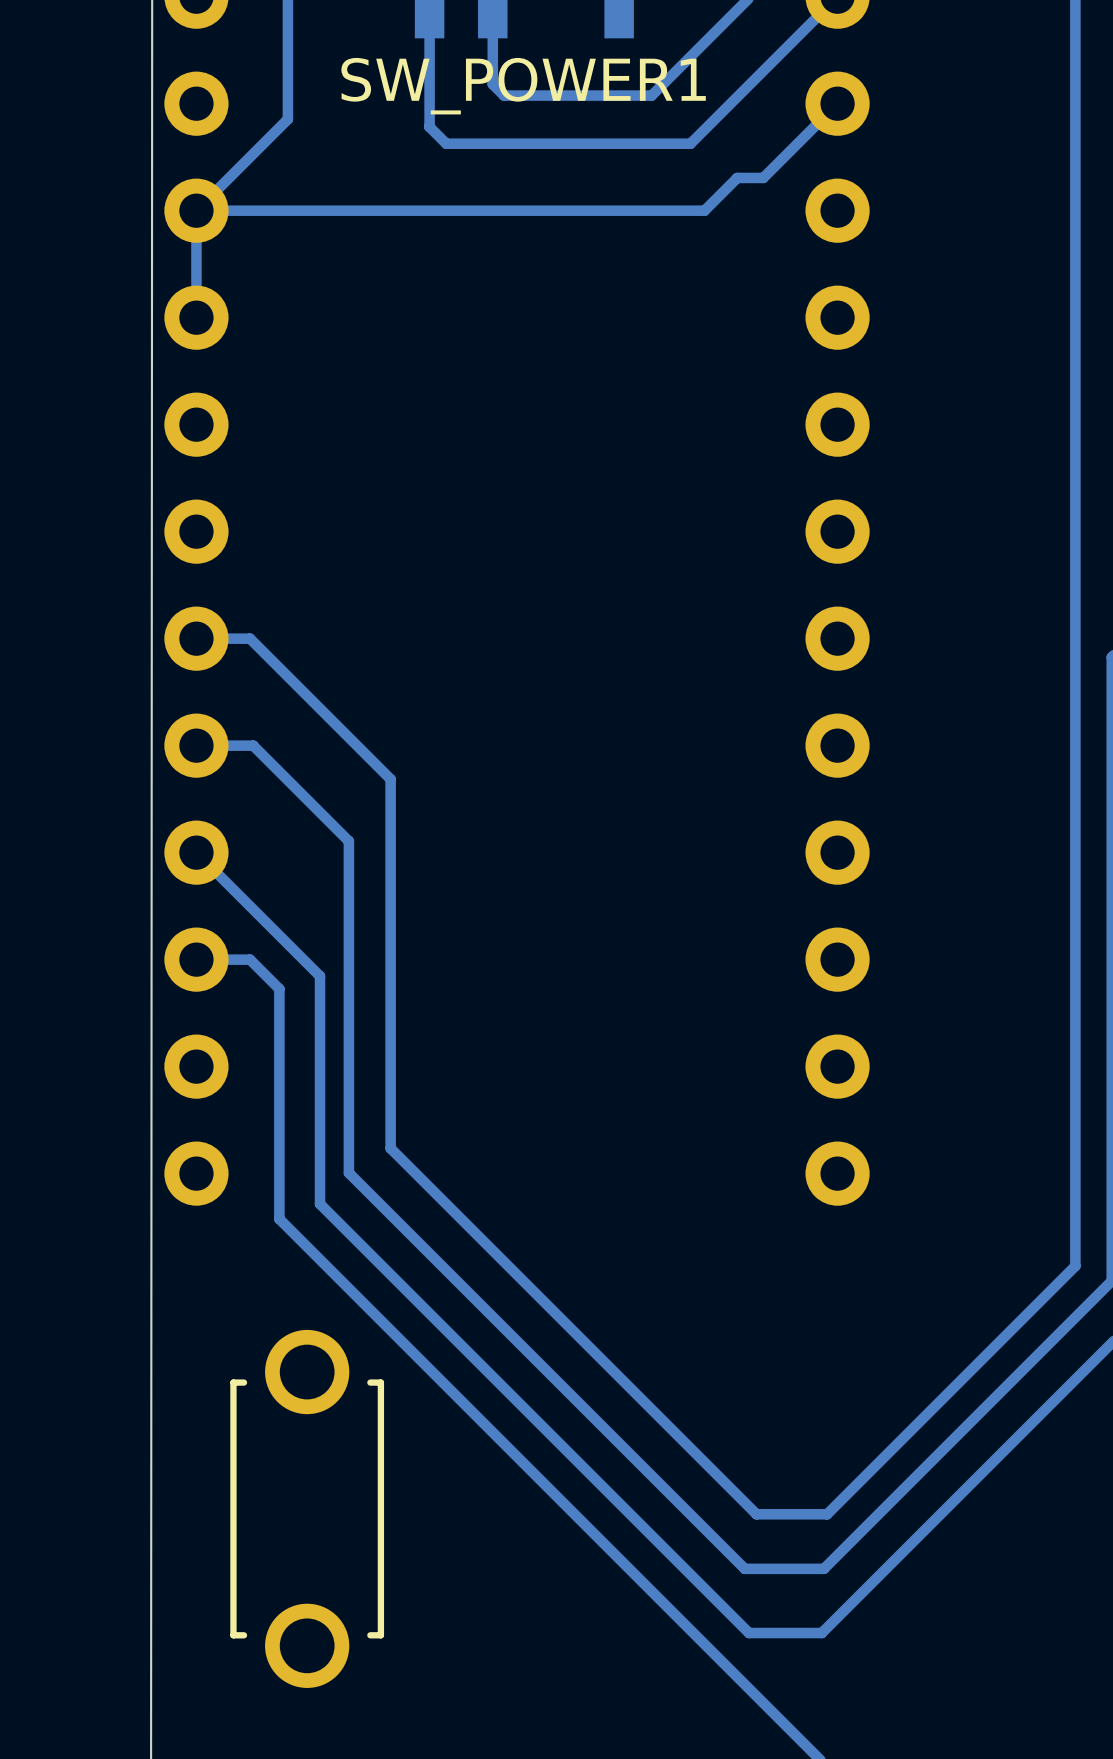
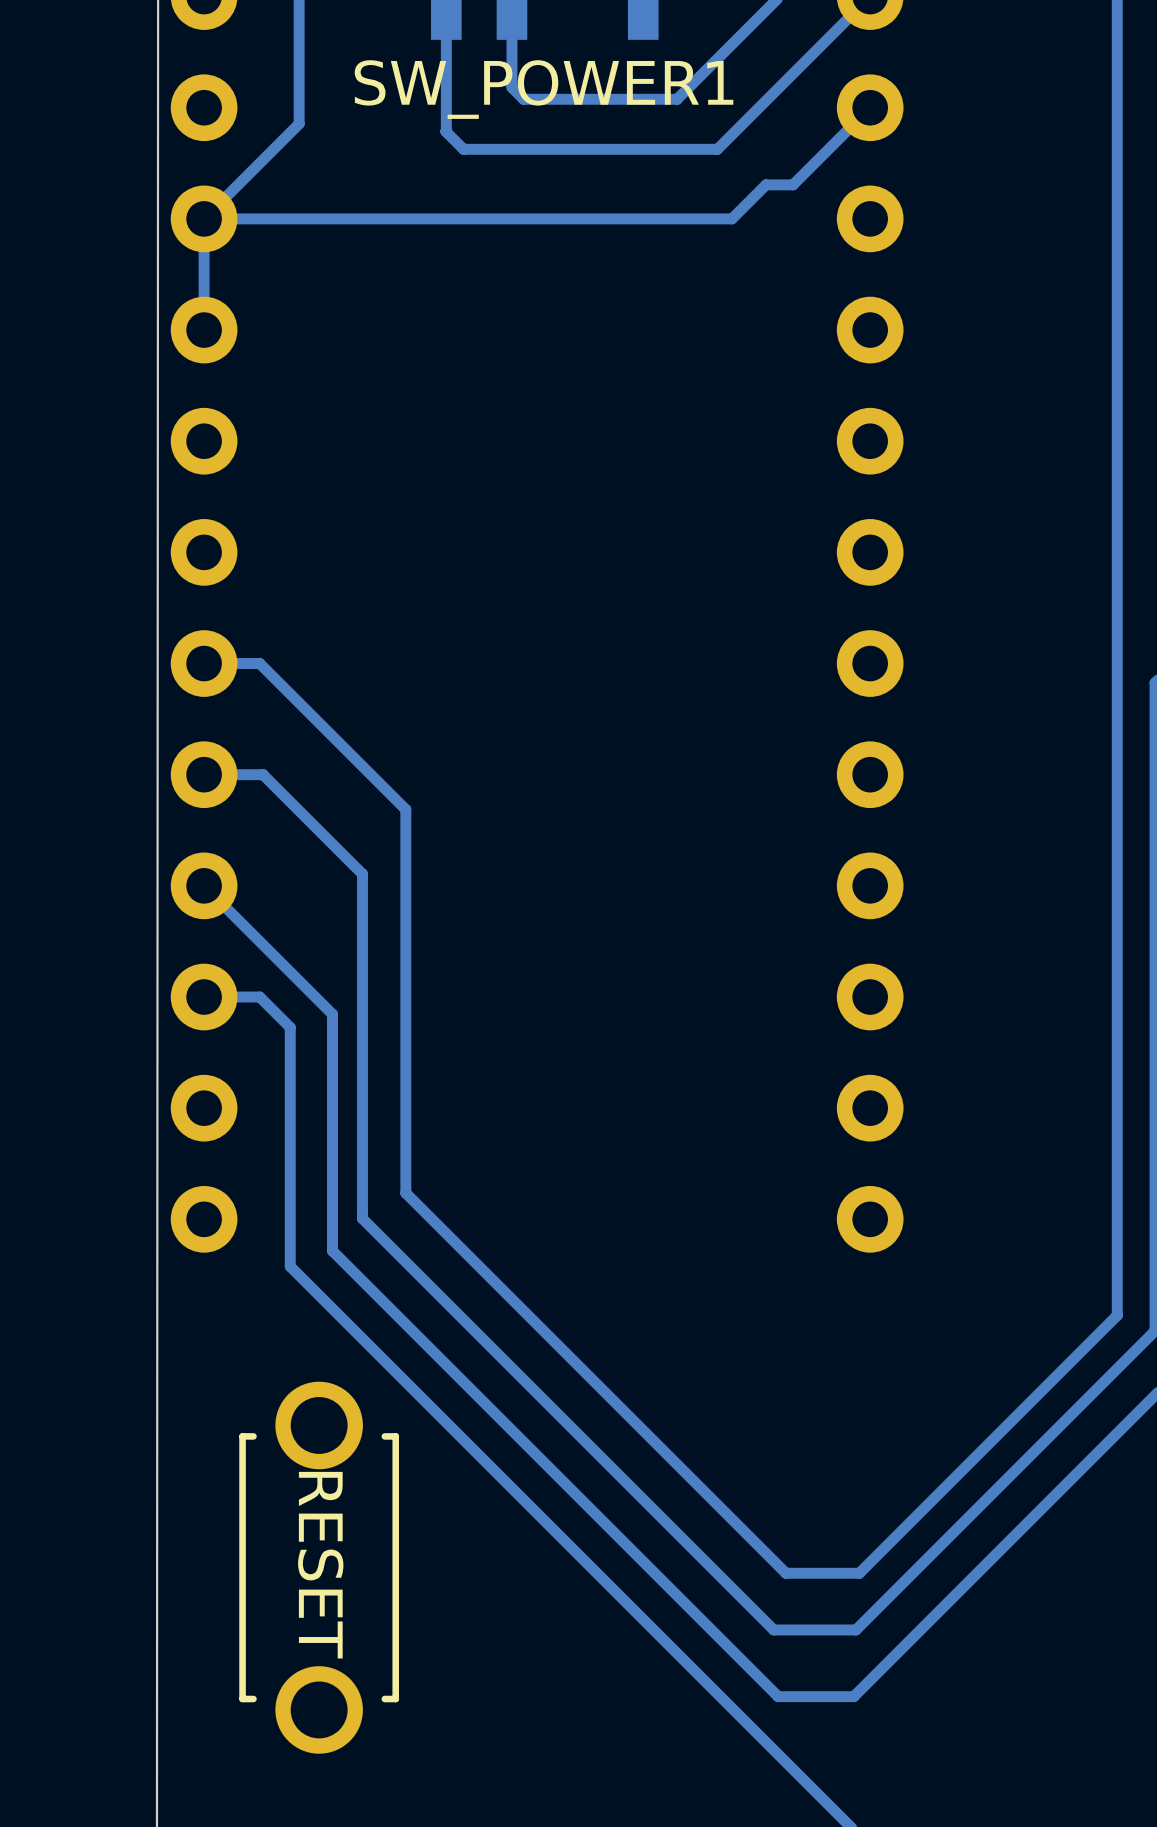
part text: none -> RESET (320, 1565)

